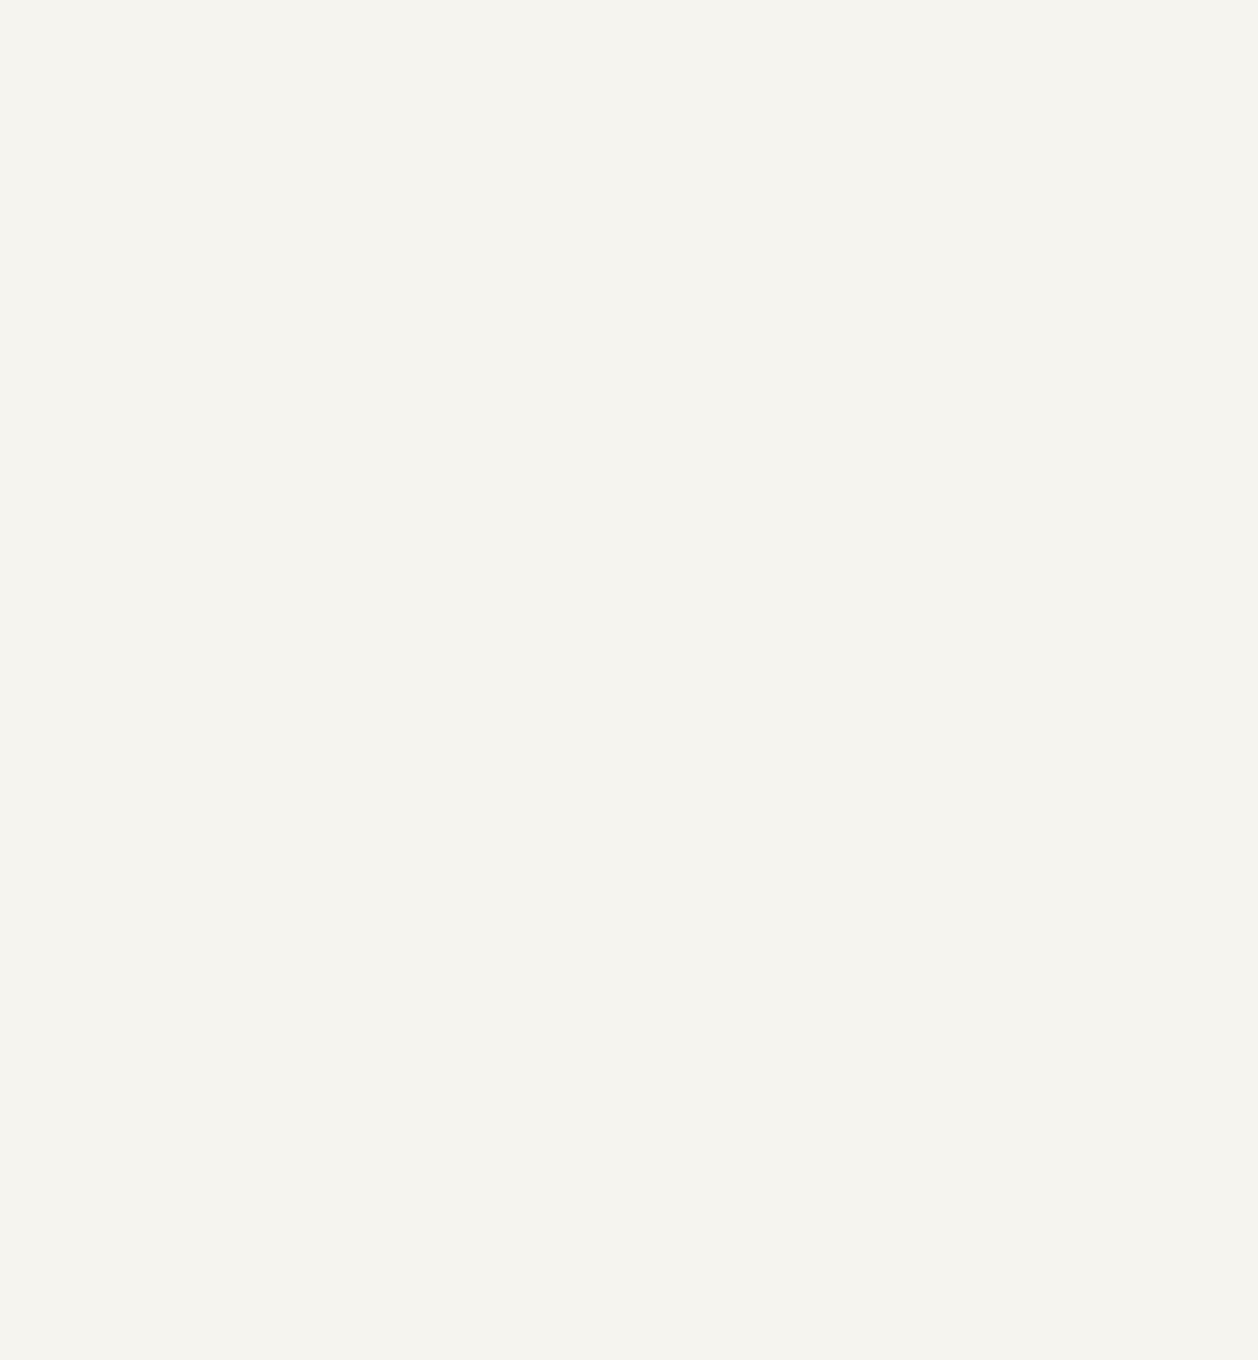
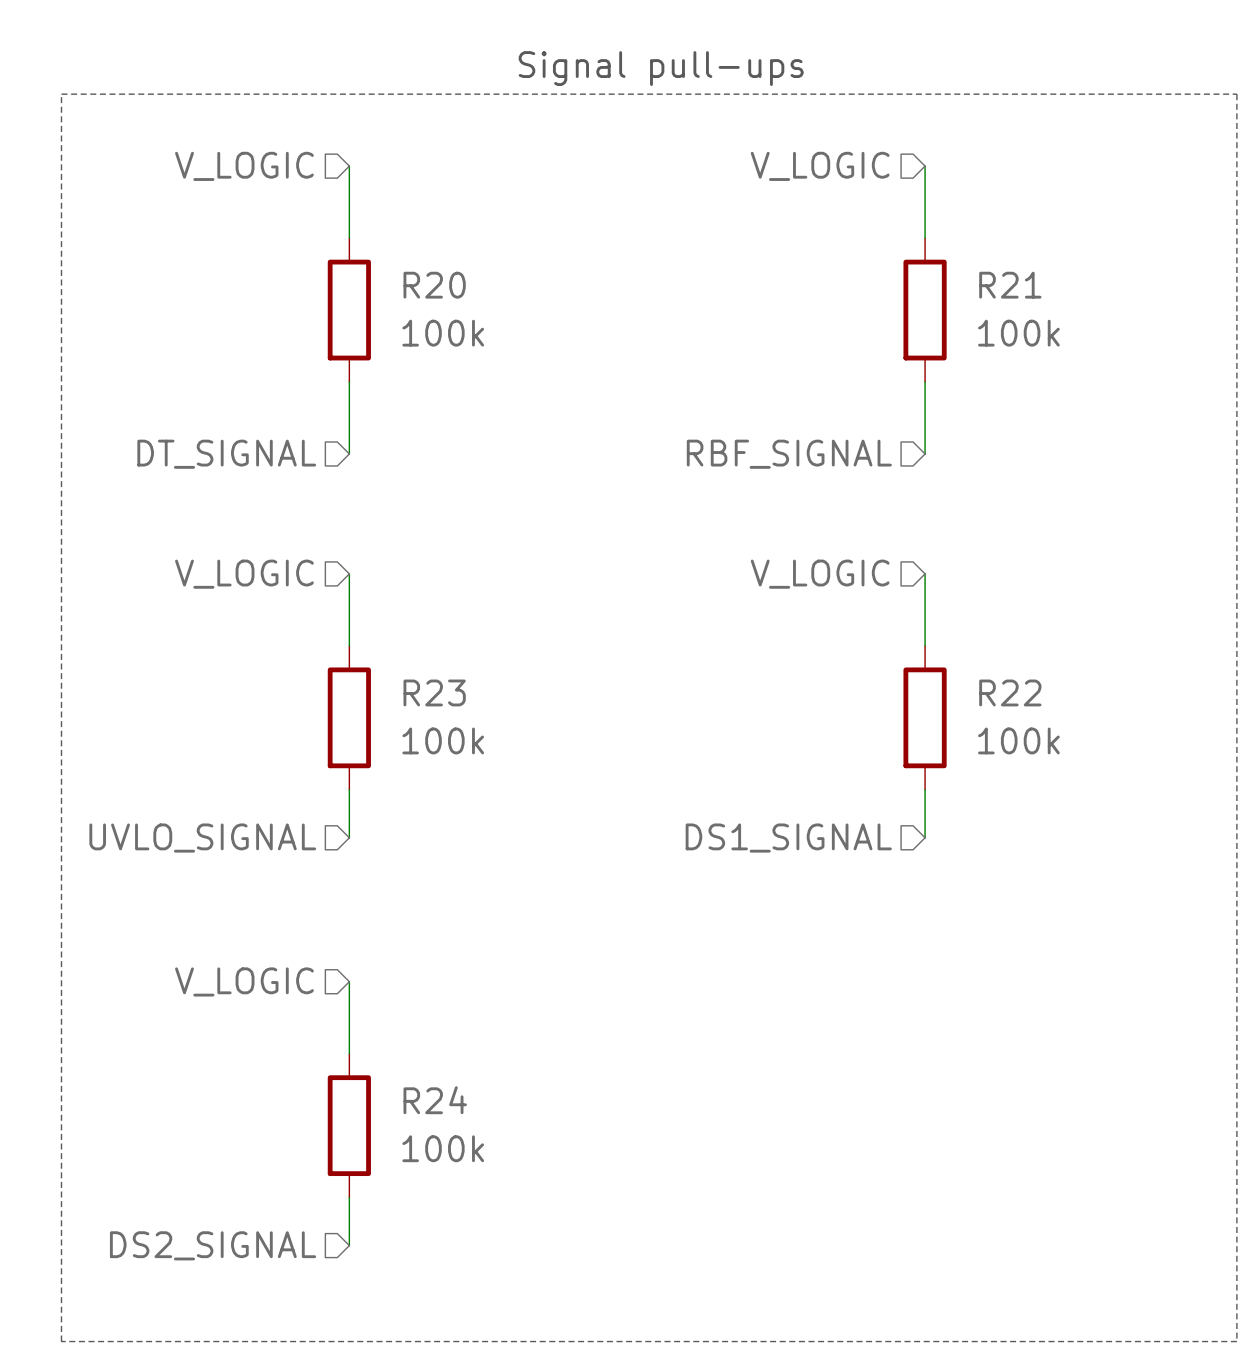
text: none -> Signal pull-ups (661, 68)
line: none -> (61, 94) (1236, 94) (1236, 1341) (61, 1341) (61, 94)
hierarchical label: none -> V_LOGIC (244, 166)
wire: none -> (349, 166) (349, 238)
hierarchical label: none -> V_LOGIC (820, 166)
wire: none -> (925, 166) (925, 238)
R20: none -> 100k (349, 310)
R21: none -> 100k (925, 310)
wire: none -> (349, 382) (349, 453)
wire: none -> (925, 382) (925, 453)
hierarchical label: none -> DT_SIGNAL (226, 454)
hierarchical label: none -> RBF_SIGNAL (789, 454)
wire: none -> (349, 573) (349, 645)
wire: none -> (925, 573) (925, 645)
hierarchical label: none -> V_LOGIC (244, 574)
hierarchical label: none -> V_LOGIC (820, 574)
R23: none -> 100k (349, 717)
R22: none -> 100k (925, 717)
wire: none -> (349, 789) (349, 837)
wire: none -> (925, 789) (925, 837)
hierarchical label: none -> UVLO_SIGNAL (202, 838)
hierarchical label: none -> DS1_SIGNAL (788, 838)
hierarchical label: none -> V_LOGIC (244, 981)
wire: none -> (349, 981) (349, 1053)
R24: none -> 100k (349, 1125)
wire: none -> (349, 1197) (349, 1245)
hierarchical label: none -> DS2_SIGNAL (213, 1245)

